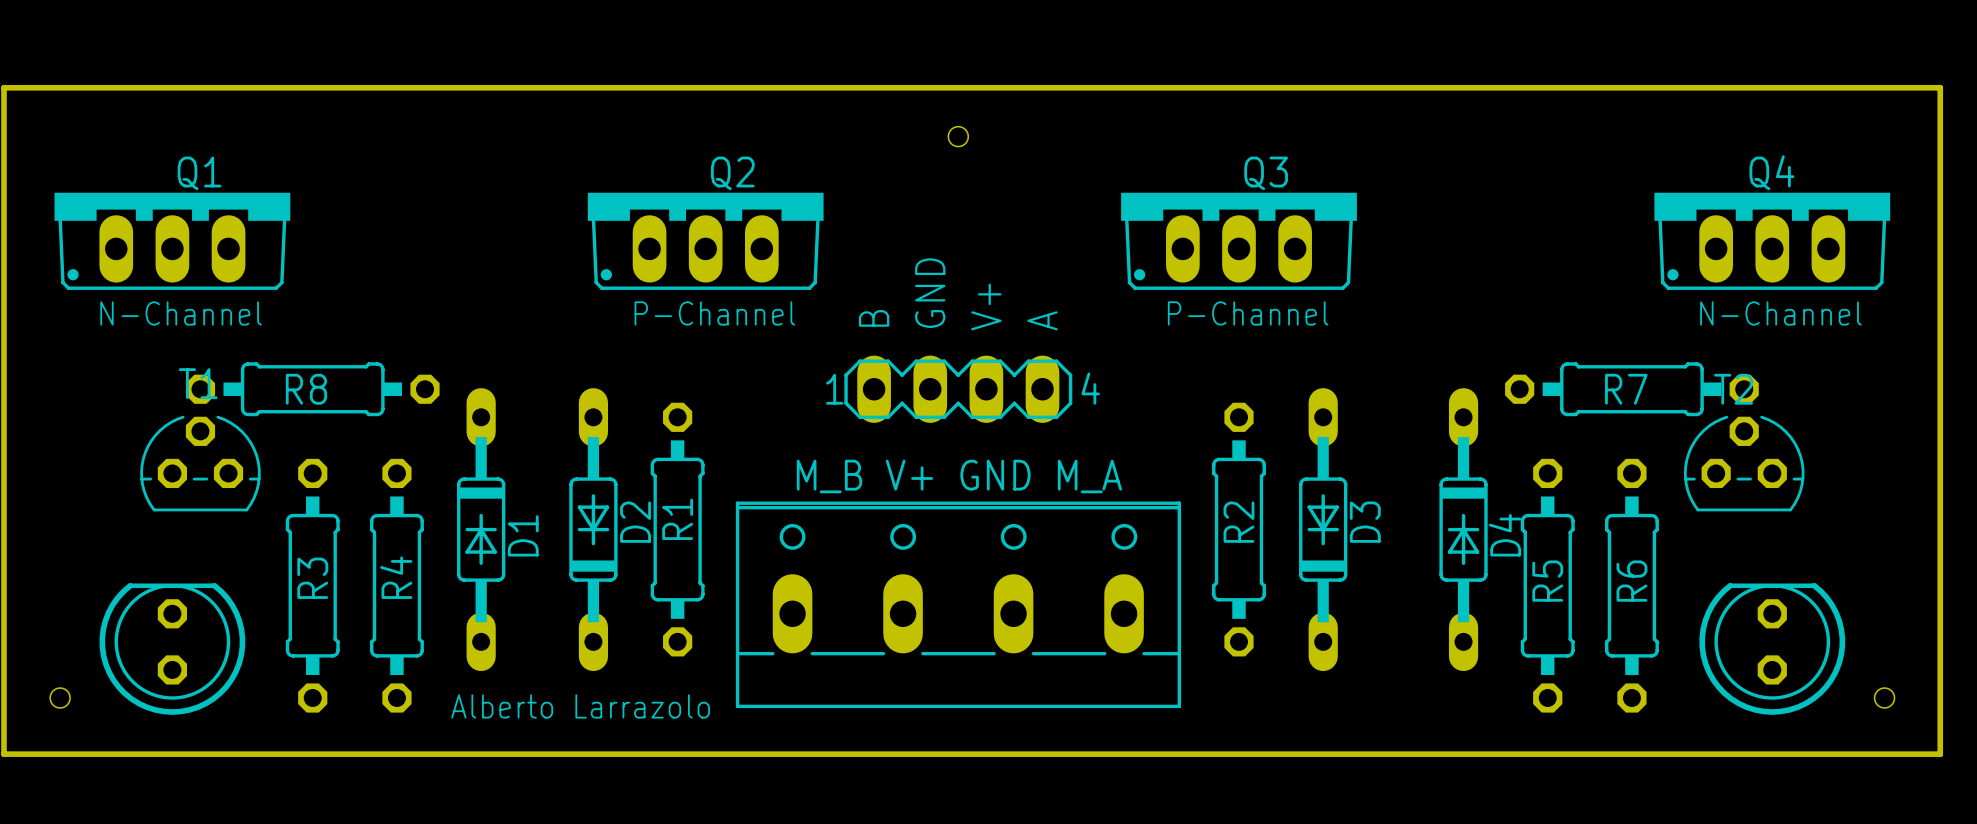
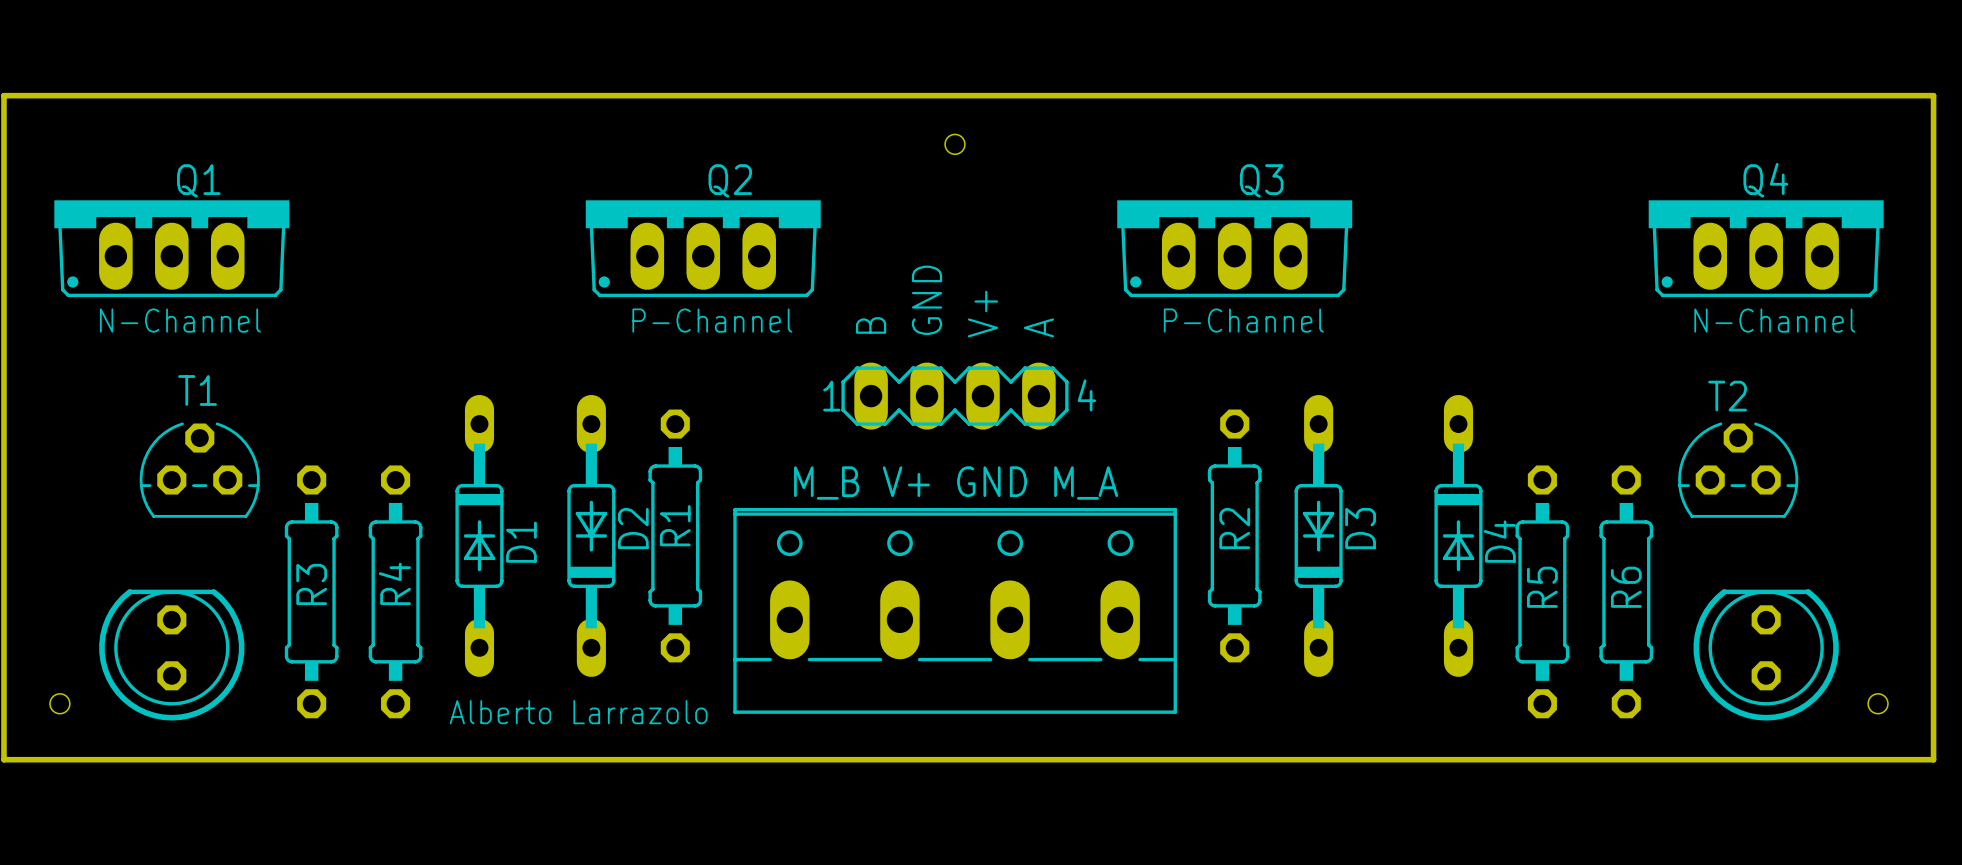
R8: (312, 389) -> none
R7: (1631, 389) -> none

